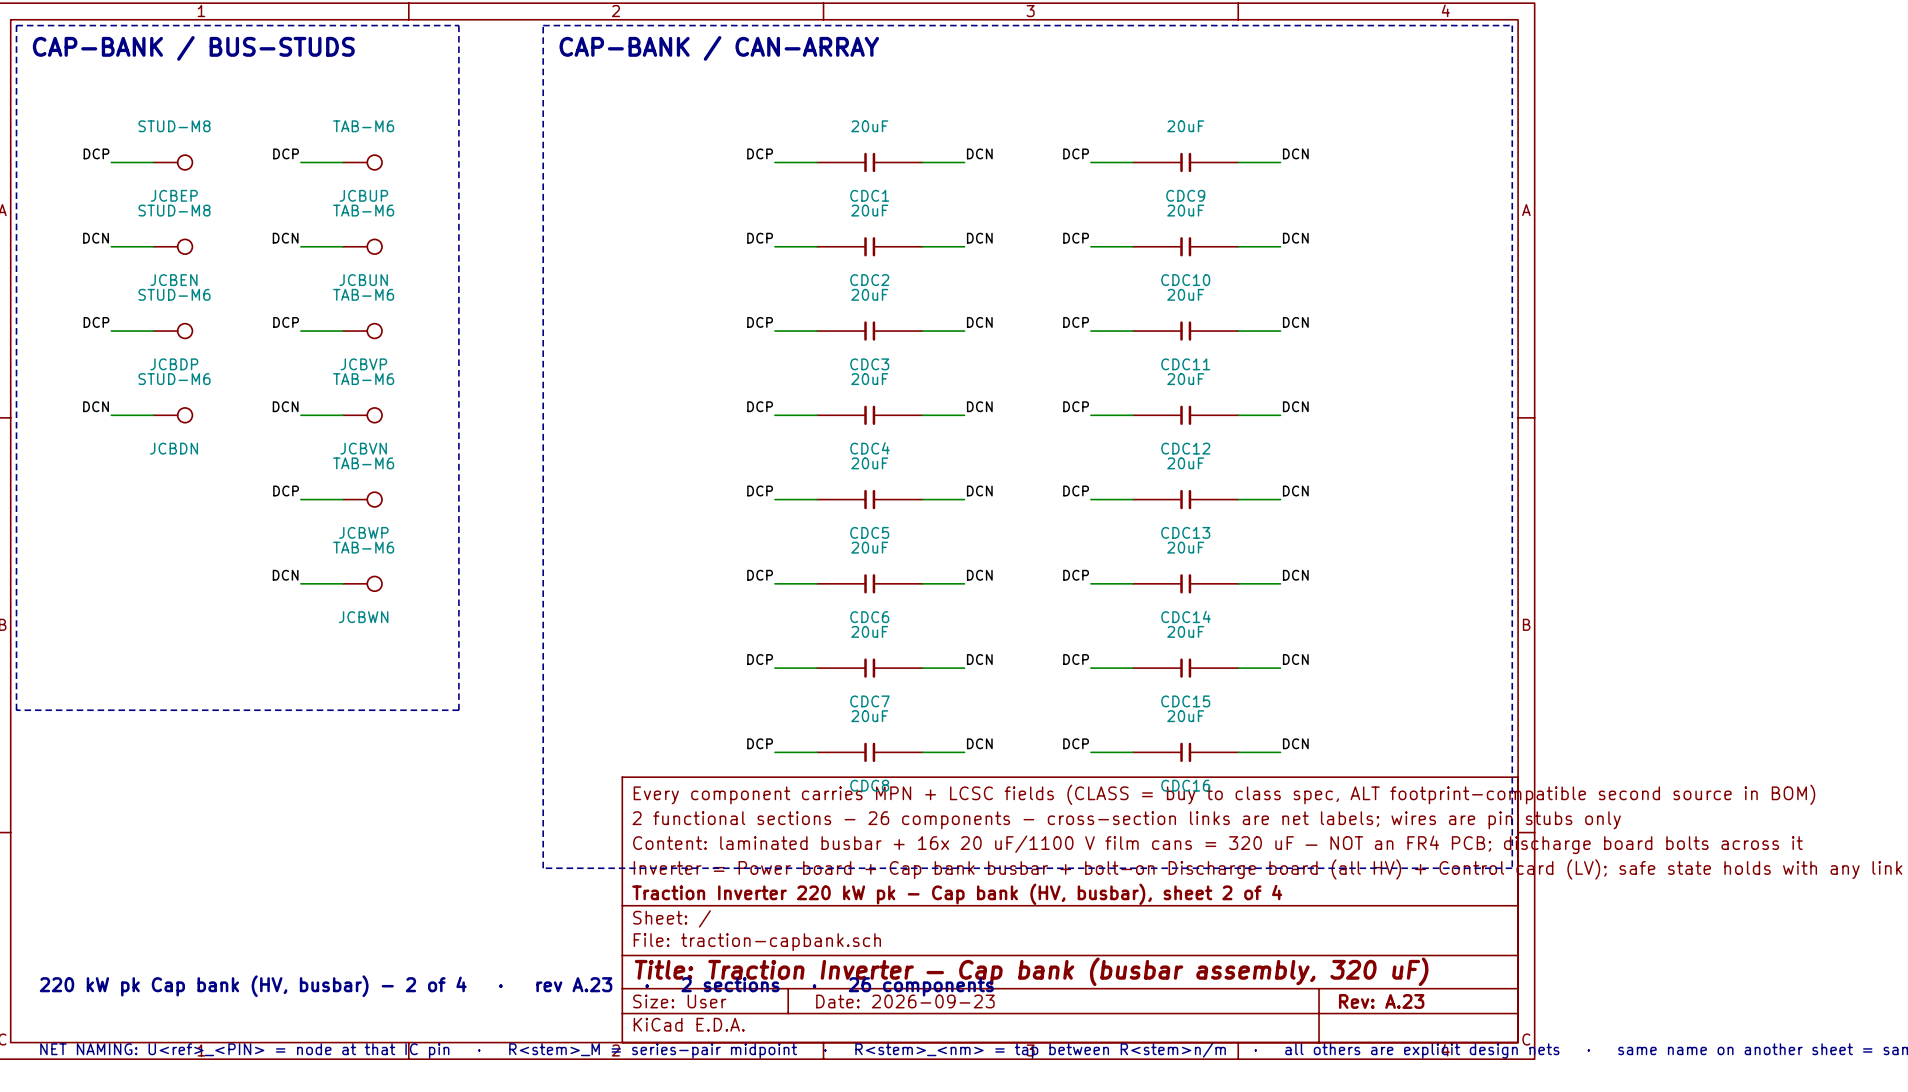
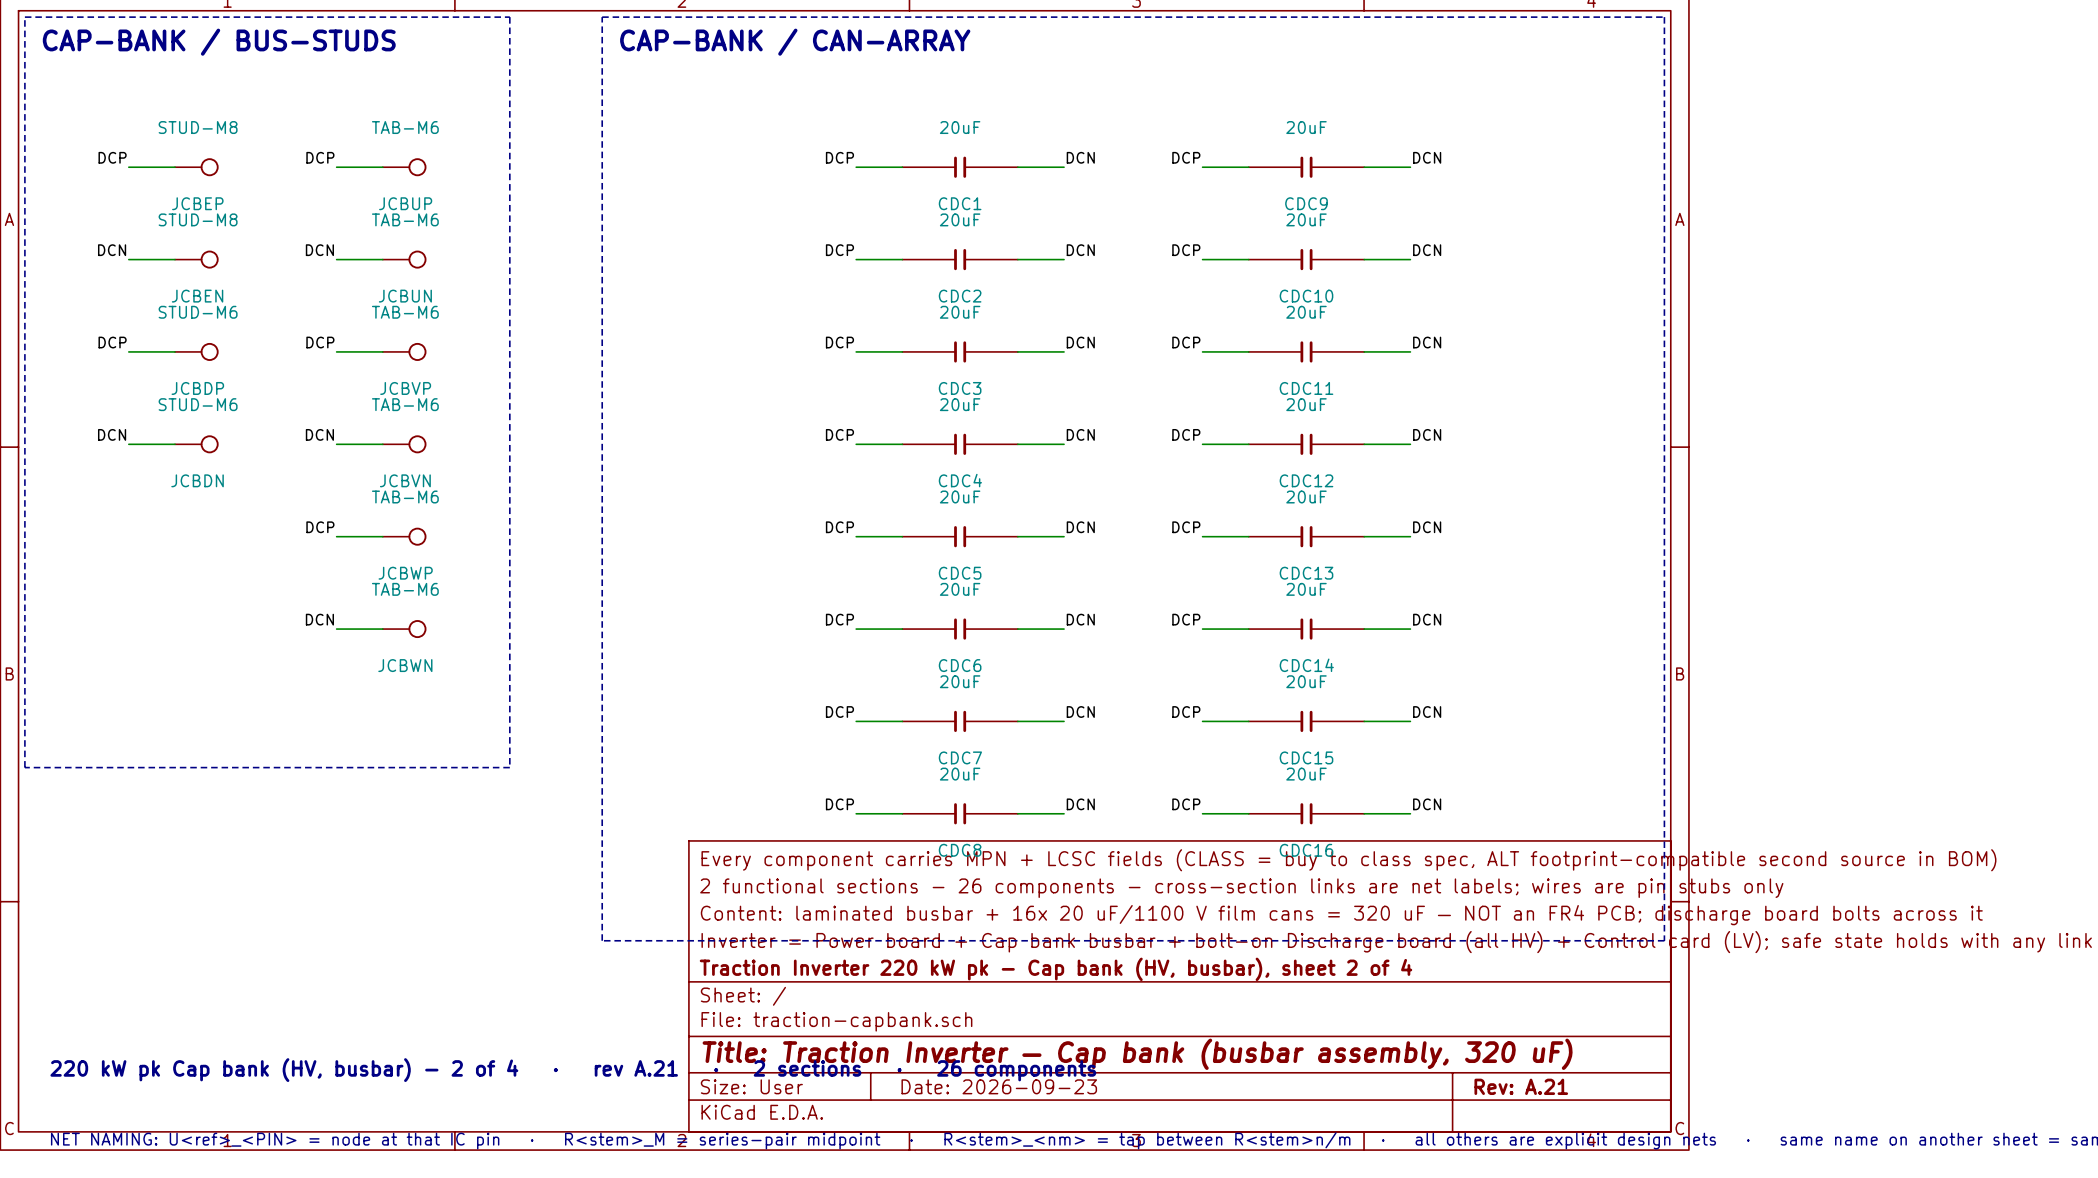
text: 220 kW pk Cap bank (HV, busbar) - 2 of 4 · rev A.23 · 2 sections · 26 components (516, 986) -> 220 kW pk Cap bank (HV, busbar) - 2 of 4 · rev A.21 · 2 sections · 26 components (573, 1070)
title block: Rev: A.23 (1381, 1001) -> Rev: A.21 (1521, 1086)

